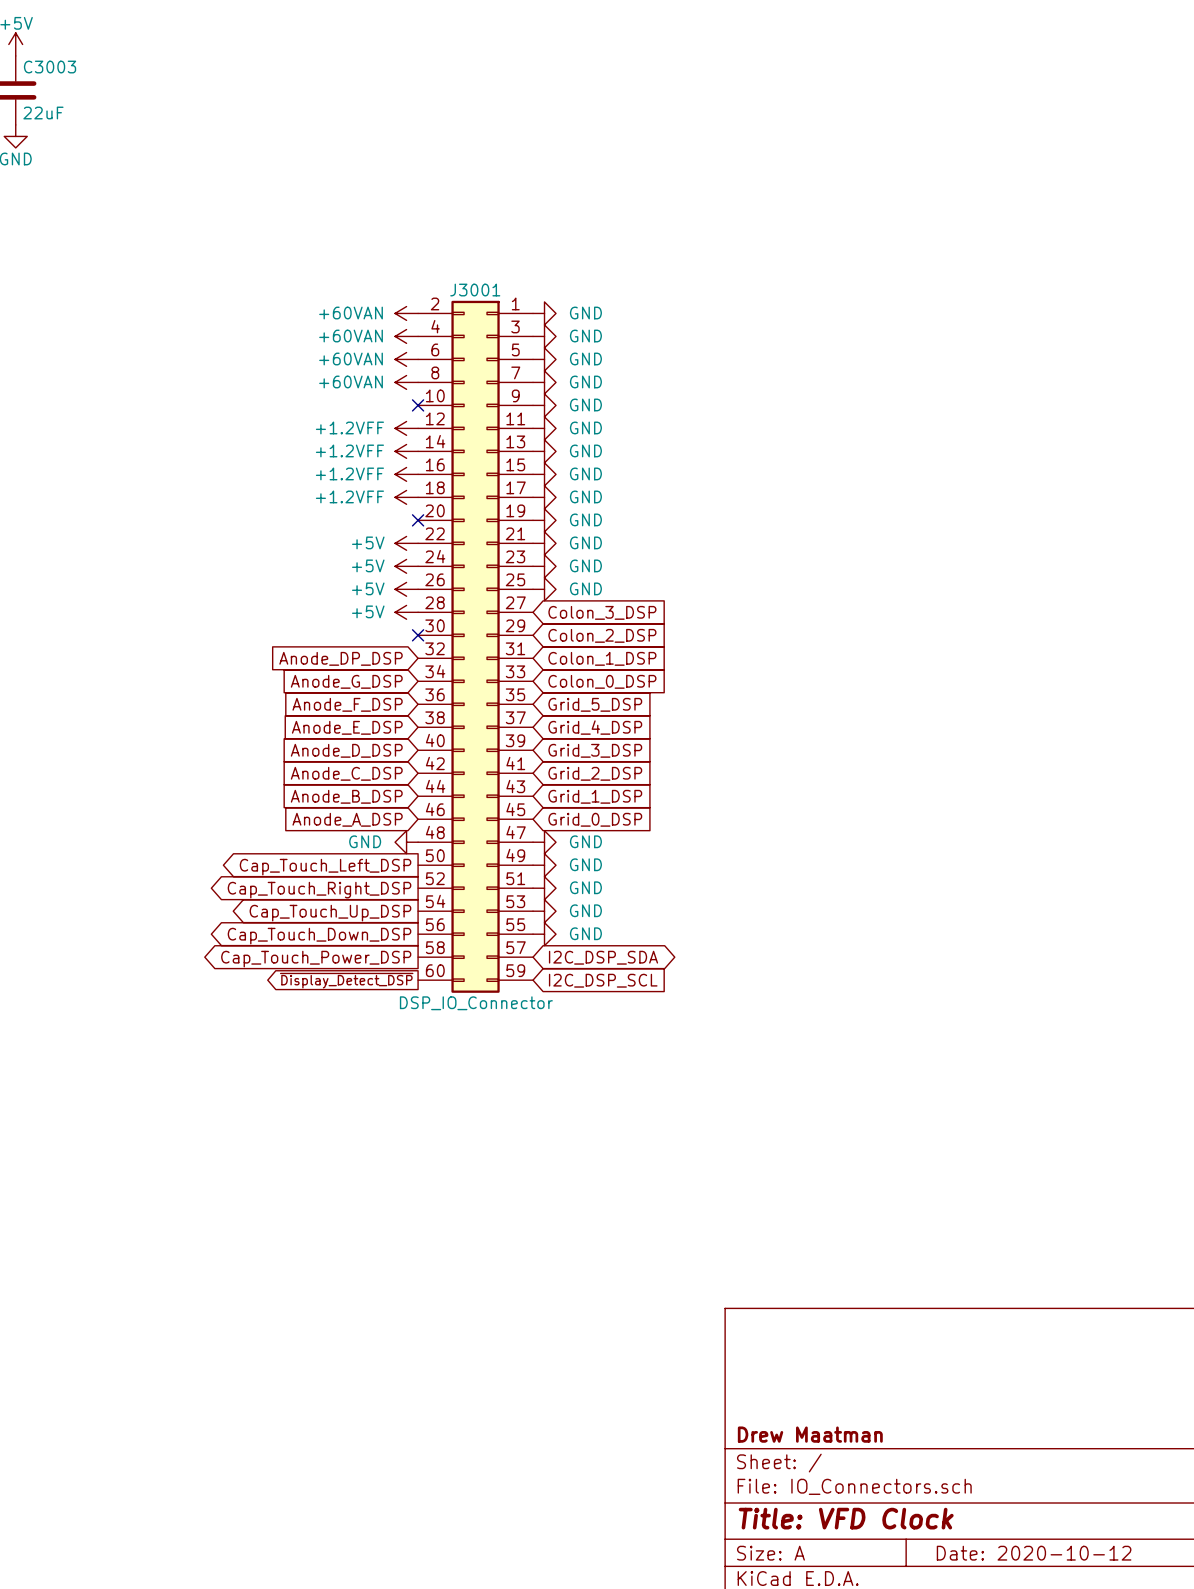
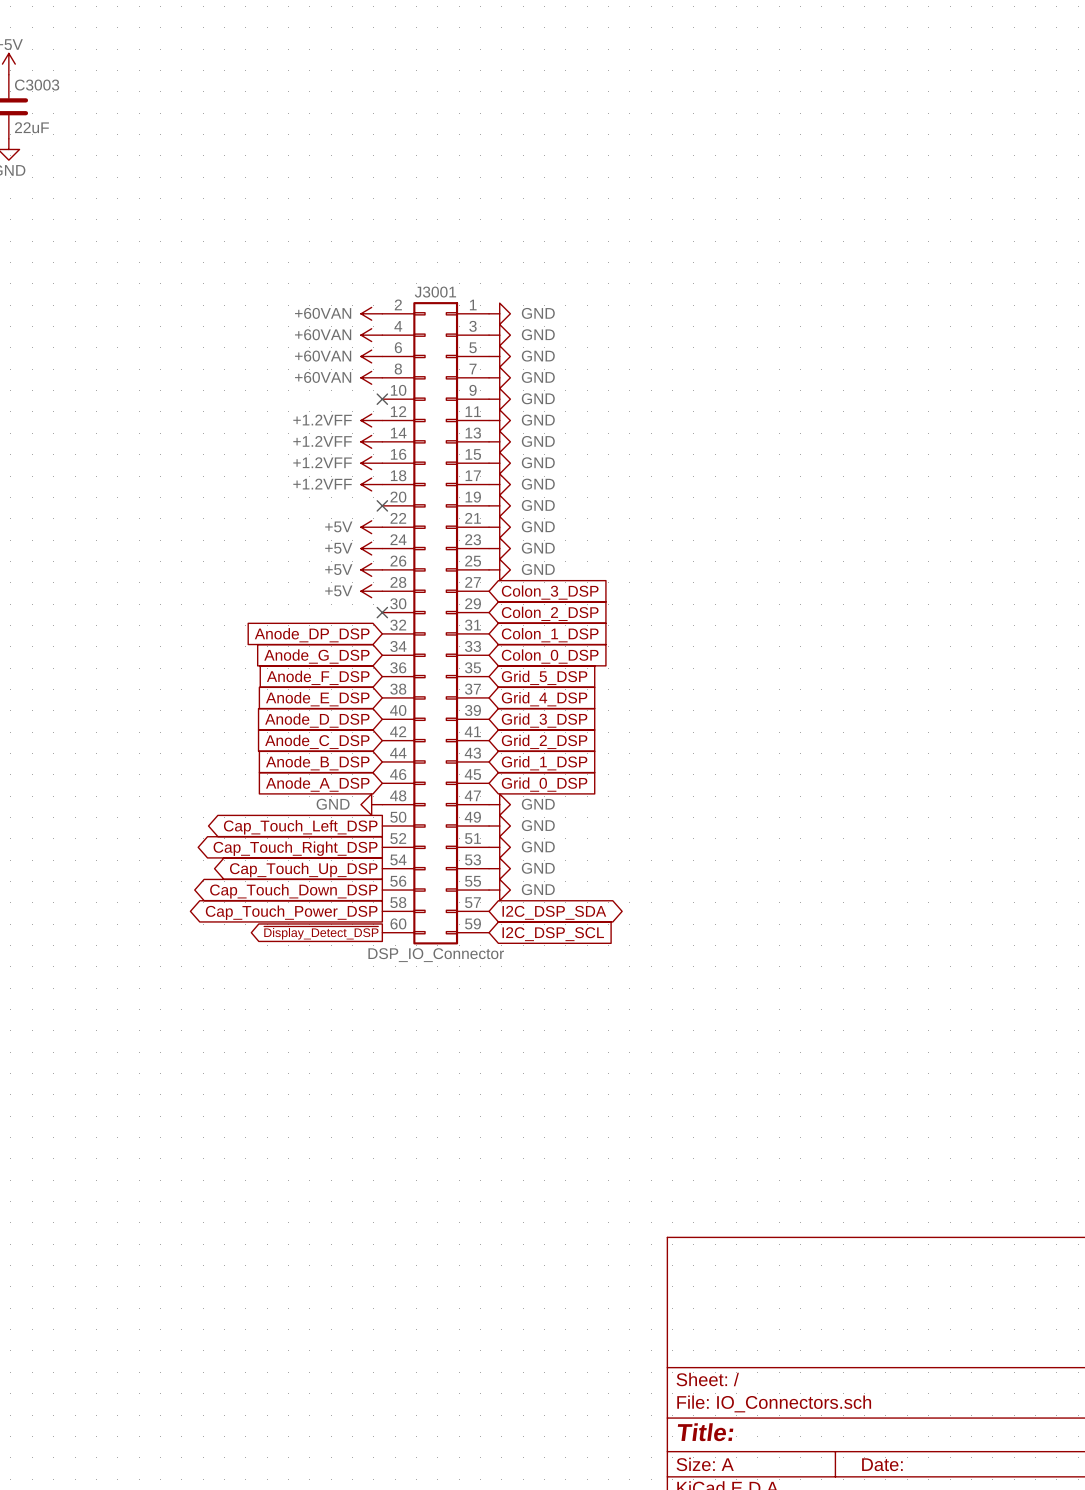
title block: Drew Maatman (810, 1434) -> none
title block: Title: VFD Clock (846, 1518) -> Title: (705, 1432)
title block: Date: 2020-10-12 (1034, 1553) -> Date: (882, 1464)

